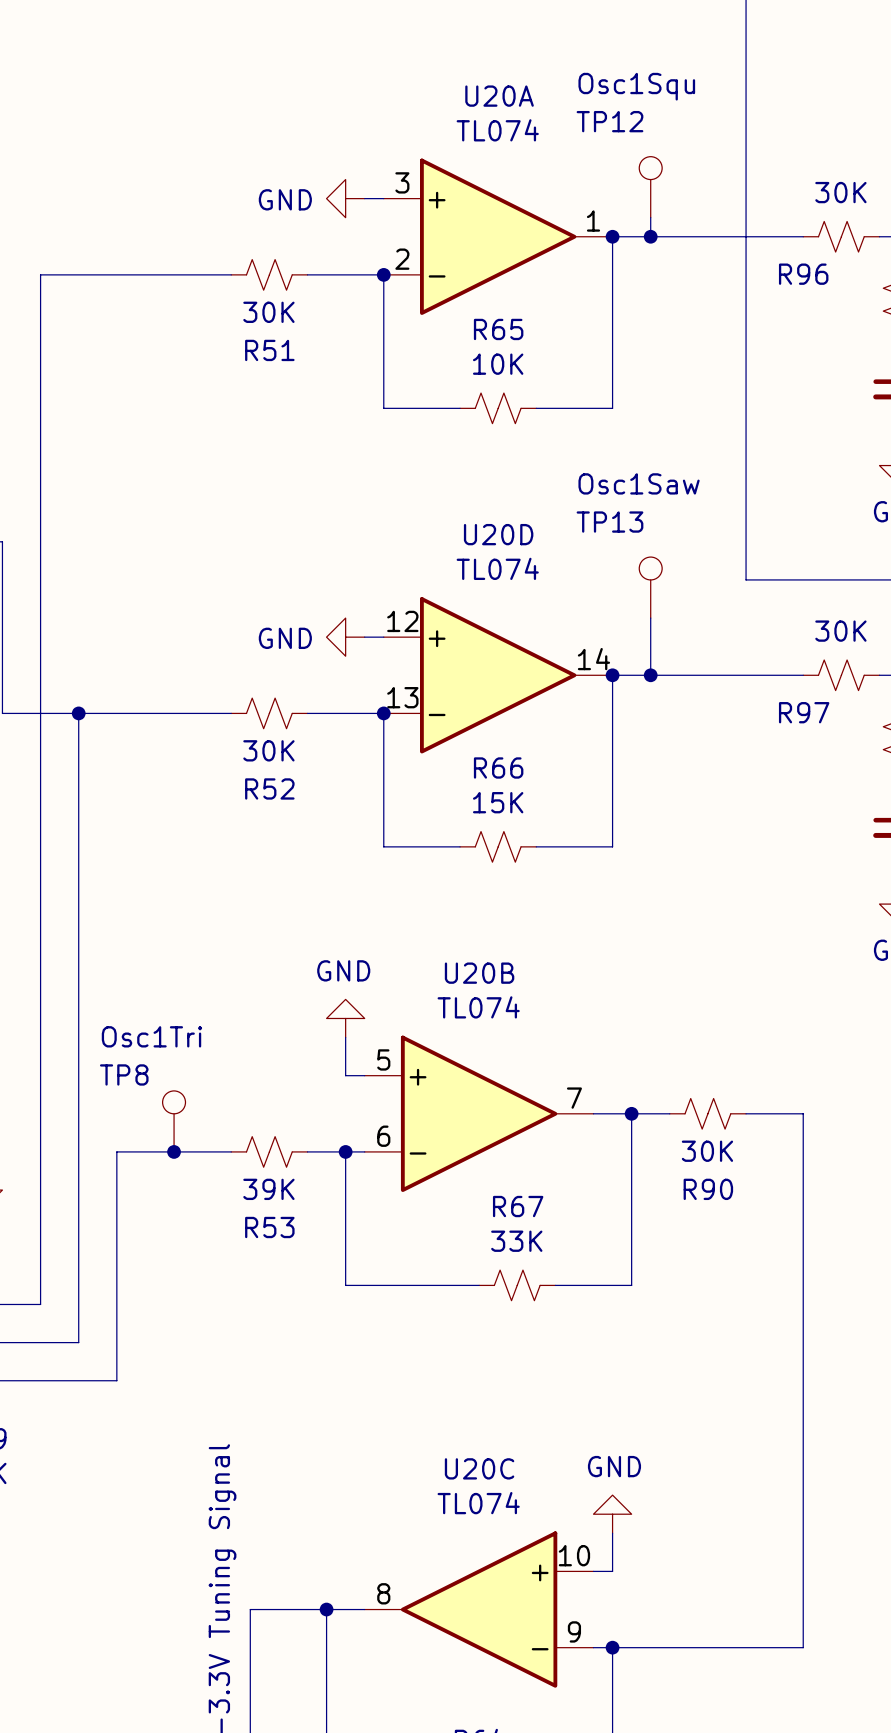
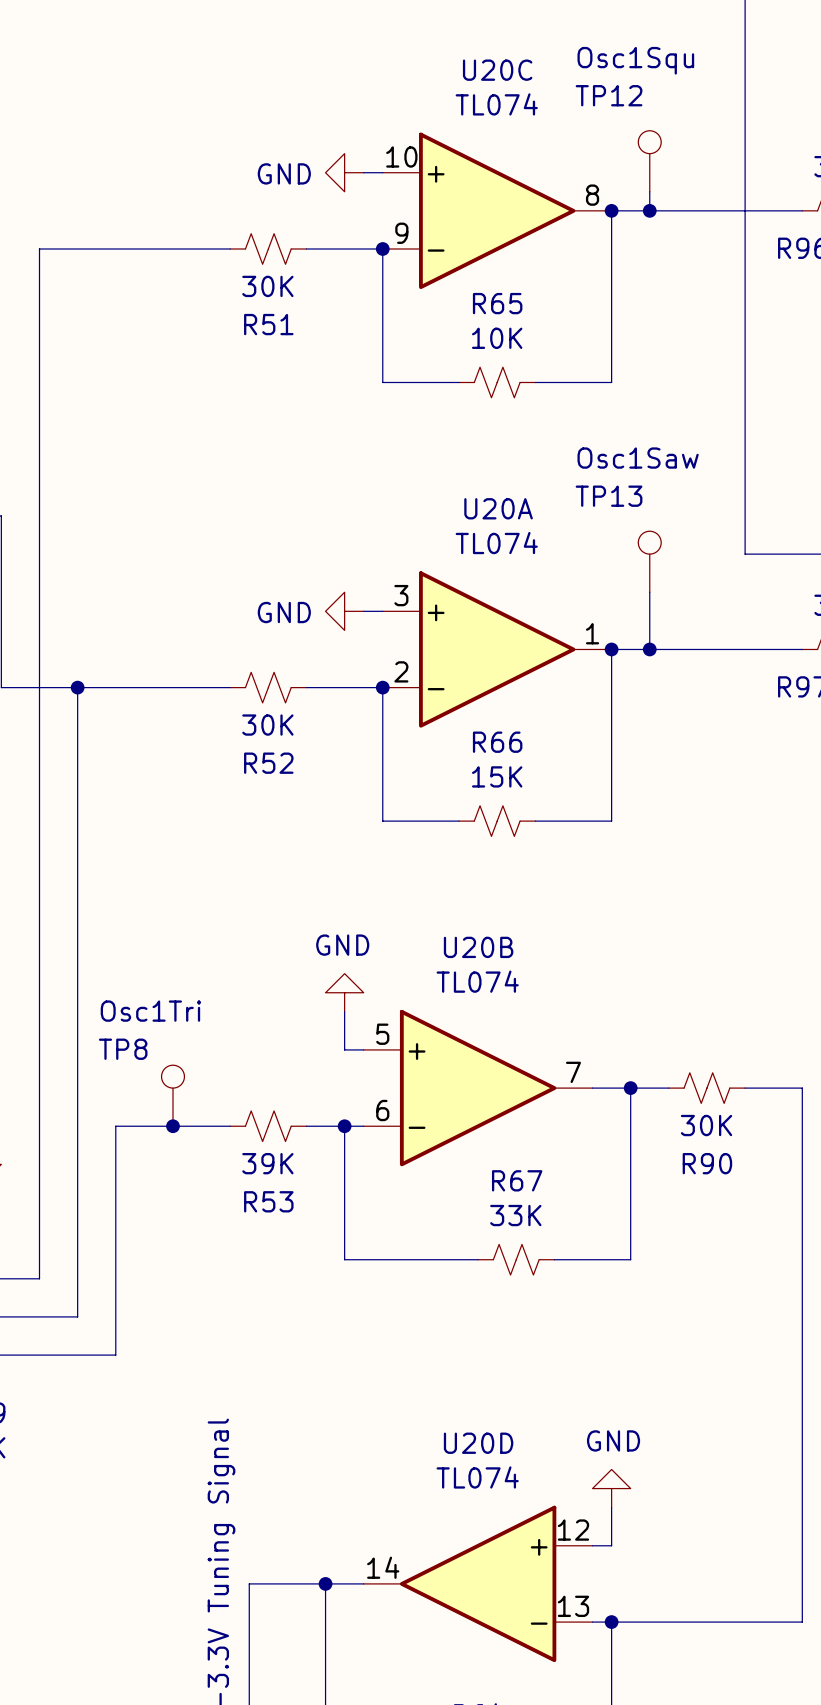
U20A position: (498, 236) -> (497, 649)
U20D flip: as is (498, 675) -> left-right (478, 1583)
U20D position: (498, 675) -> (478, 1583)
U20C flip: as is (479, 1609) -> left-right (497, 210)
U20C position: (479, 1609) -> (497, 210)

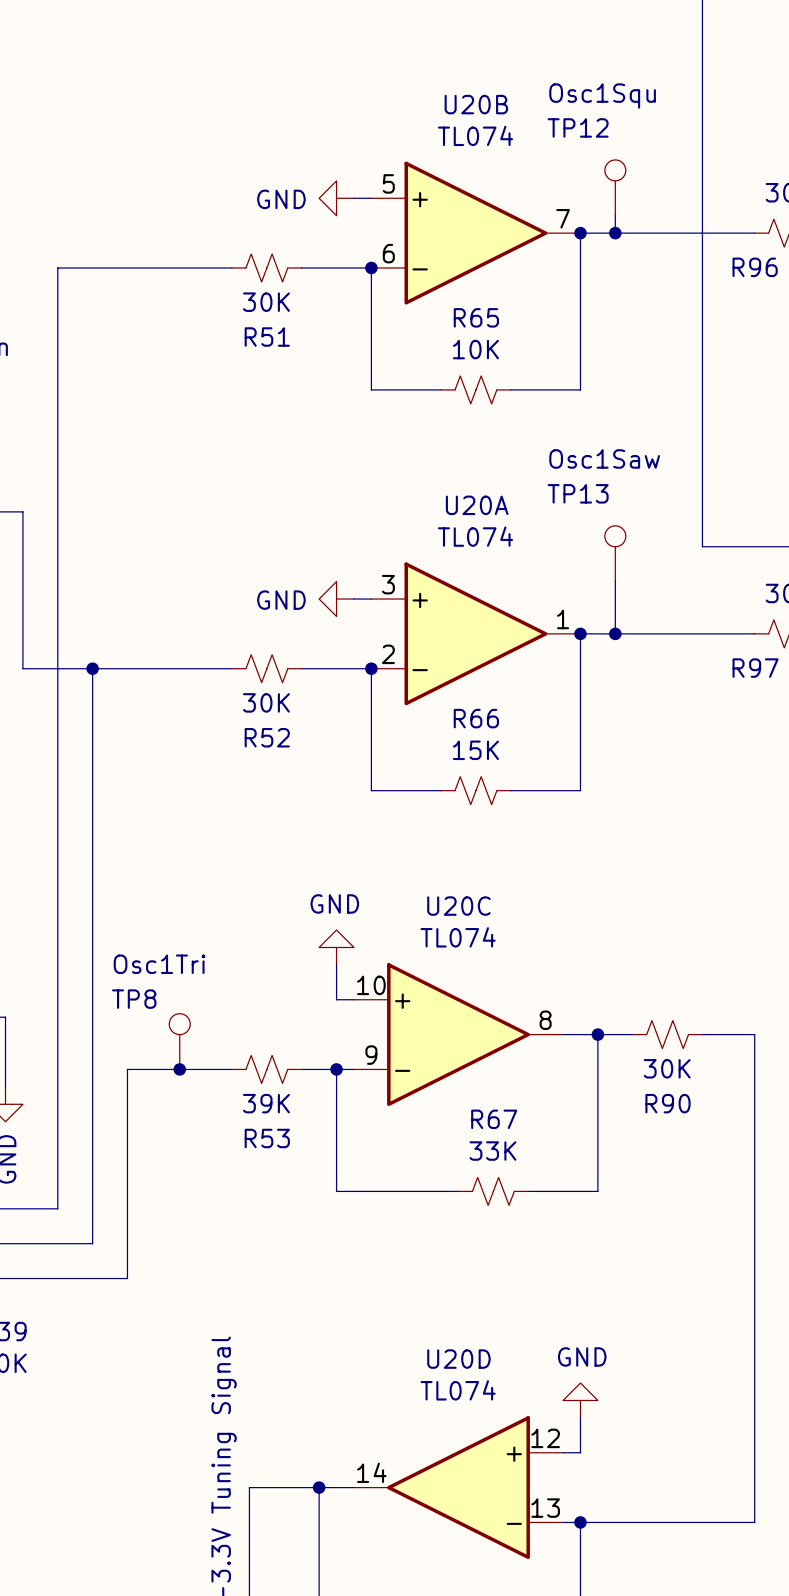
U20C position: (497, 210) -> (458, 1034)
U20B position: (478, 1088) -> (475, 233)

